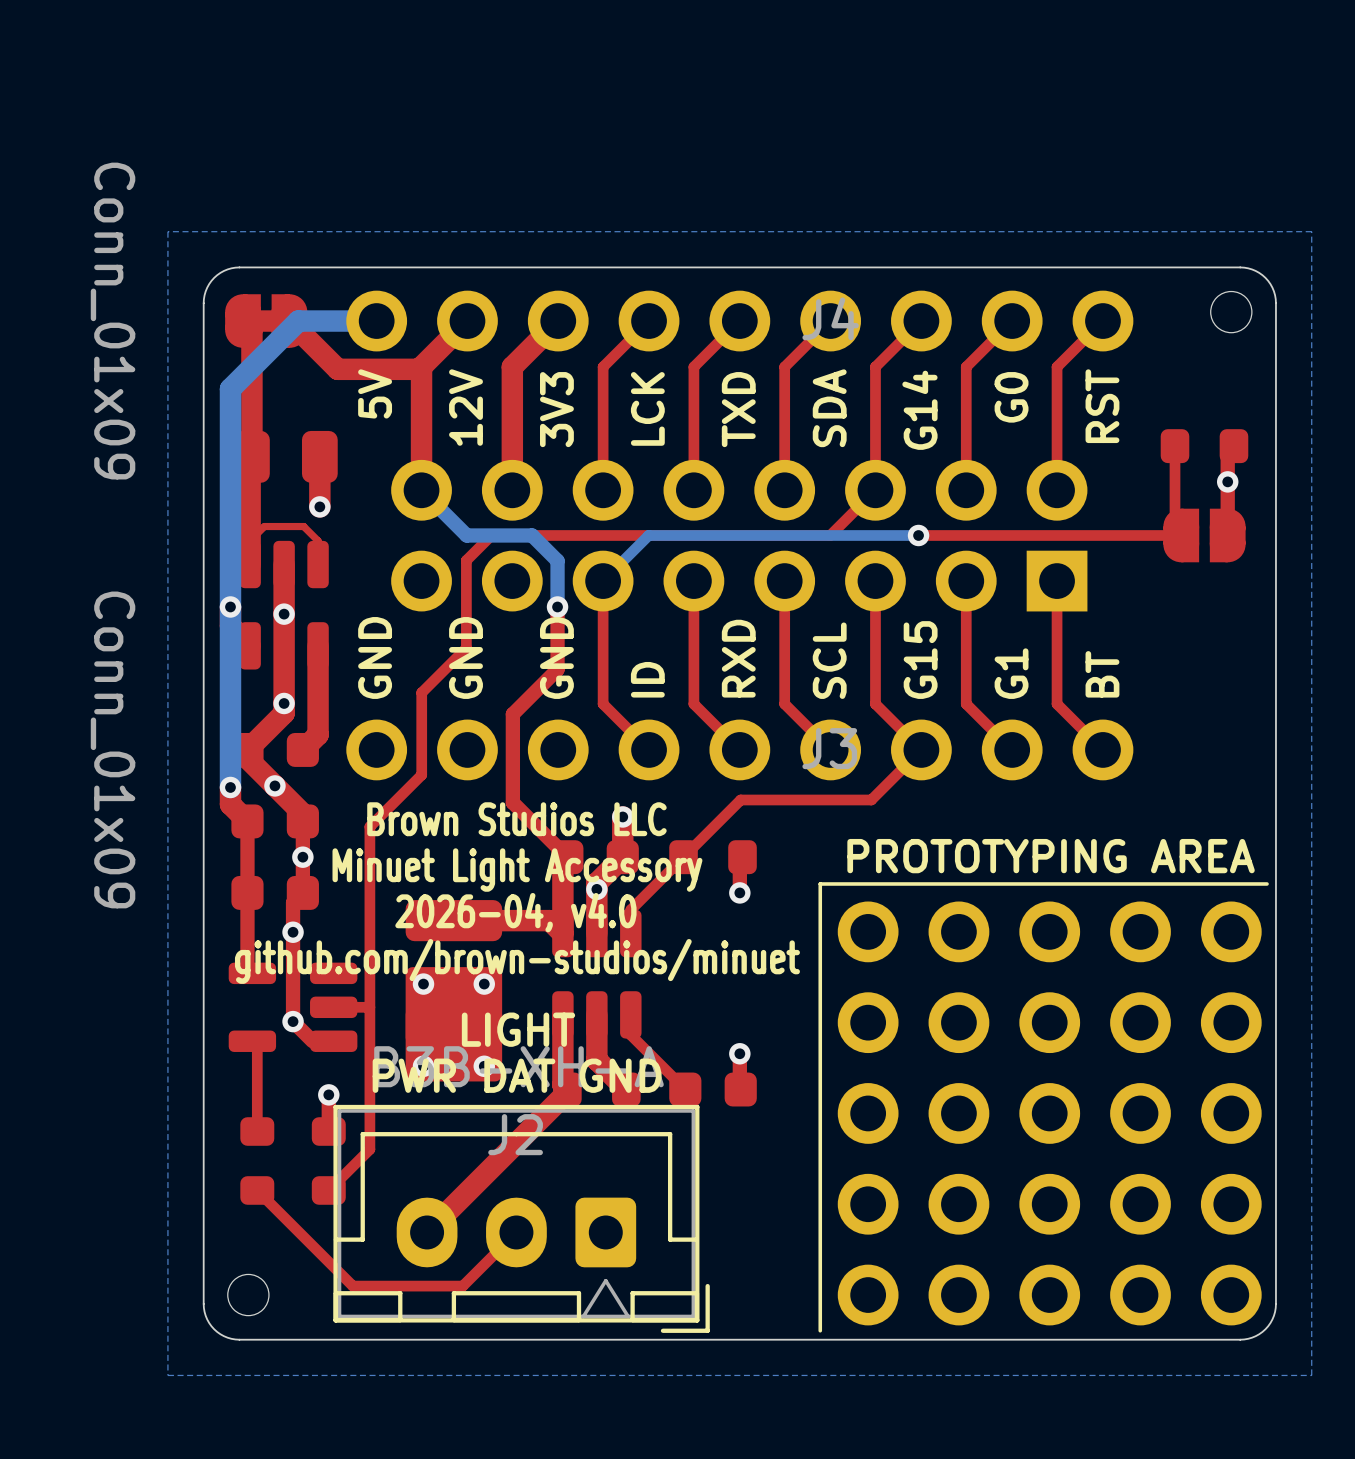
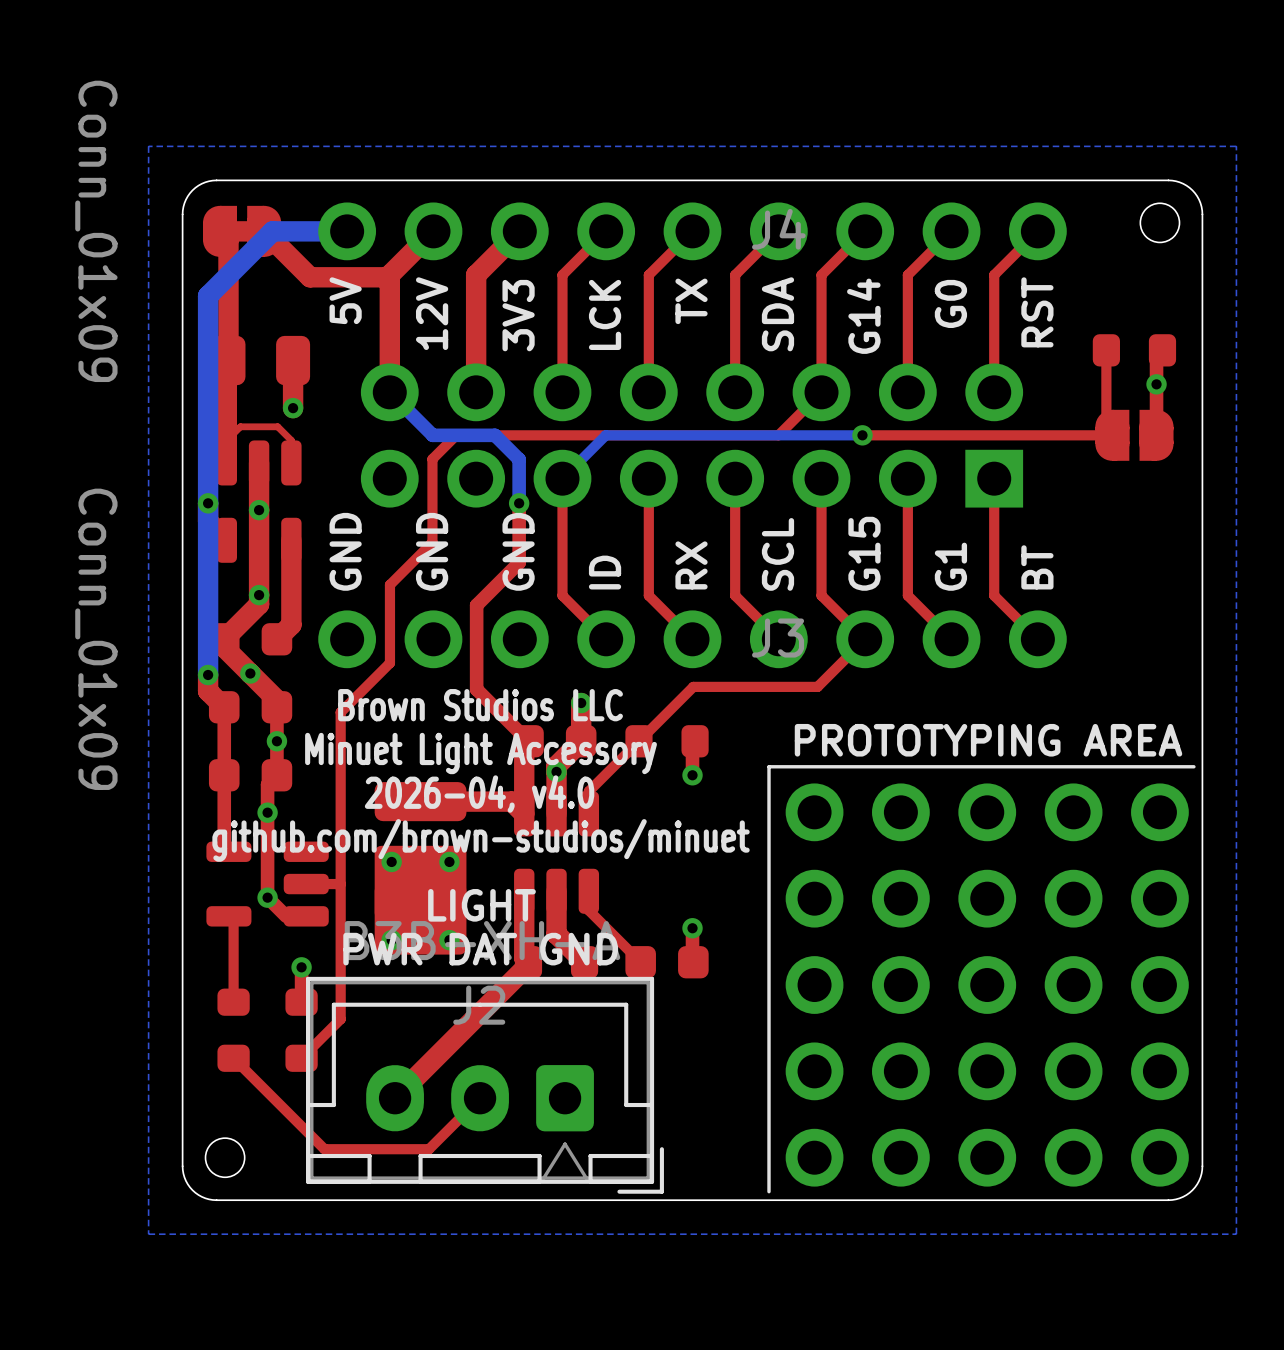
text: TXD (738, 409) -> TX (691, 301)
text: RXD (738, 658) -> RX (691, 565)

